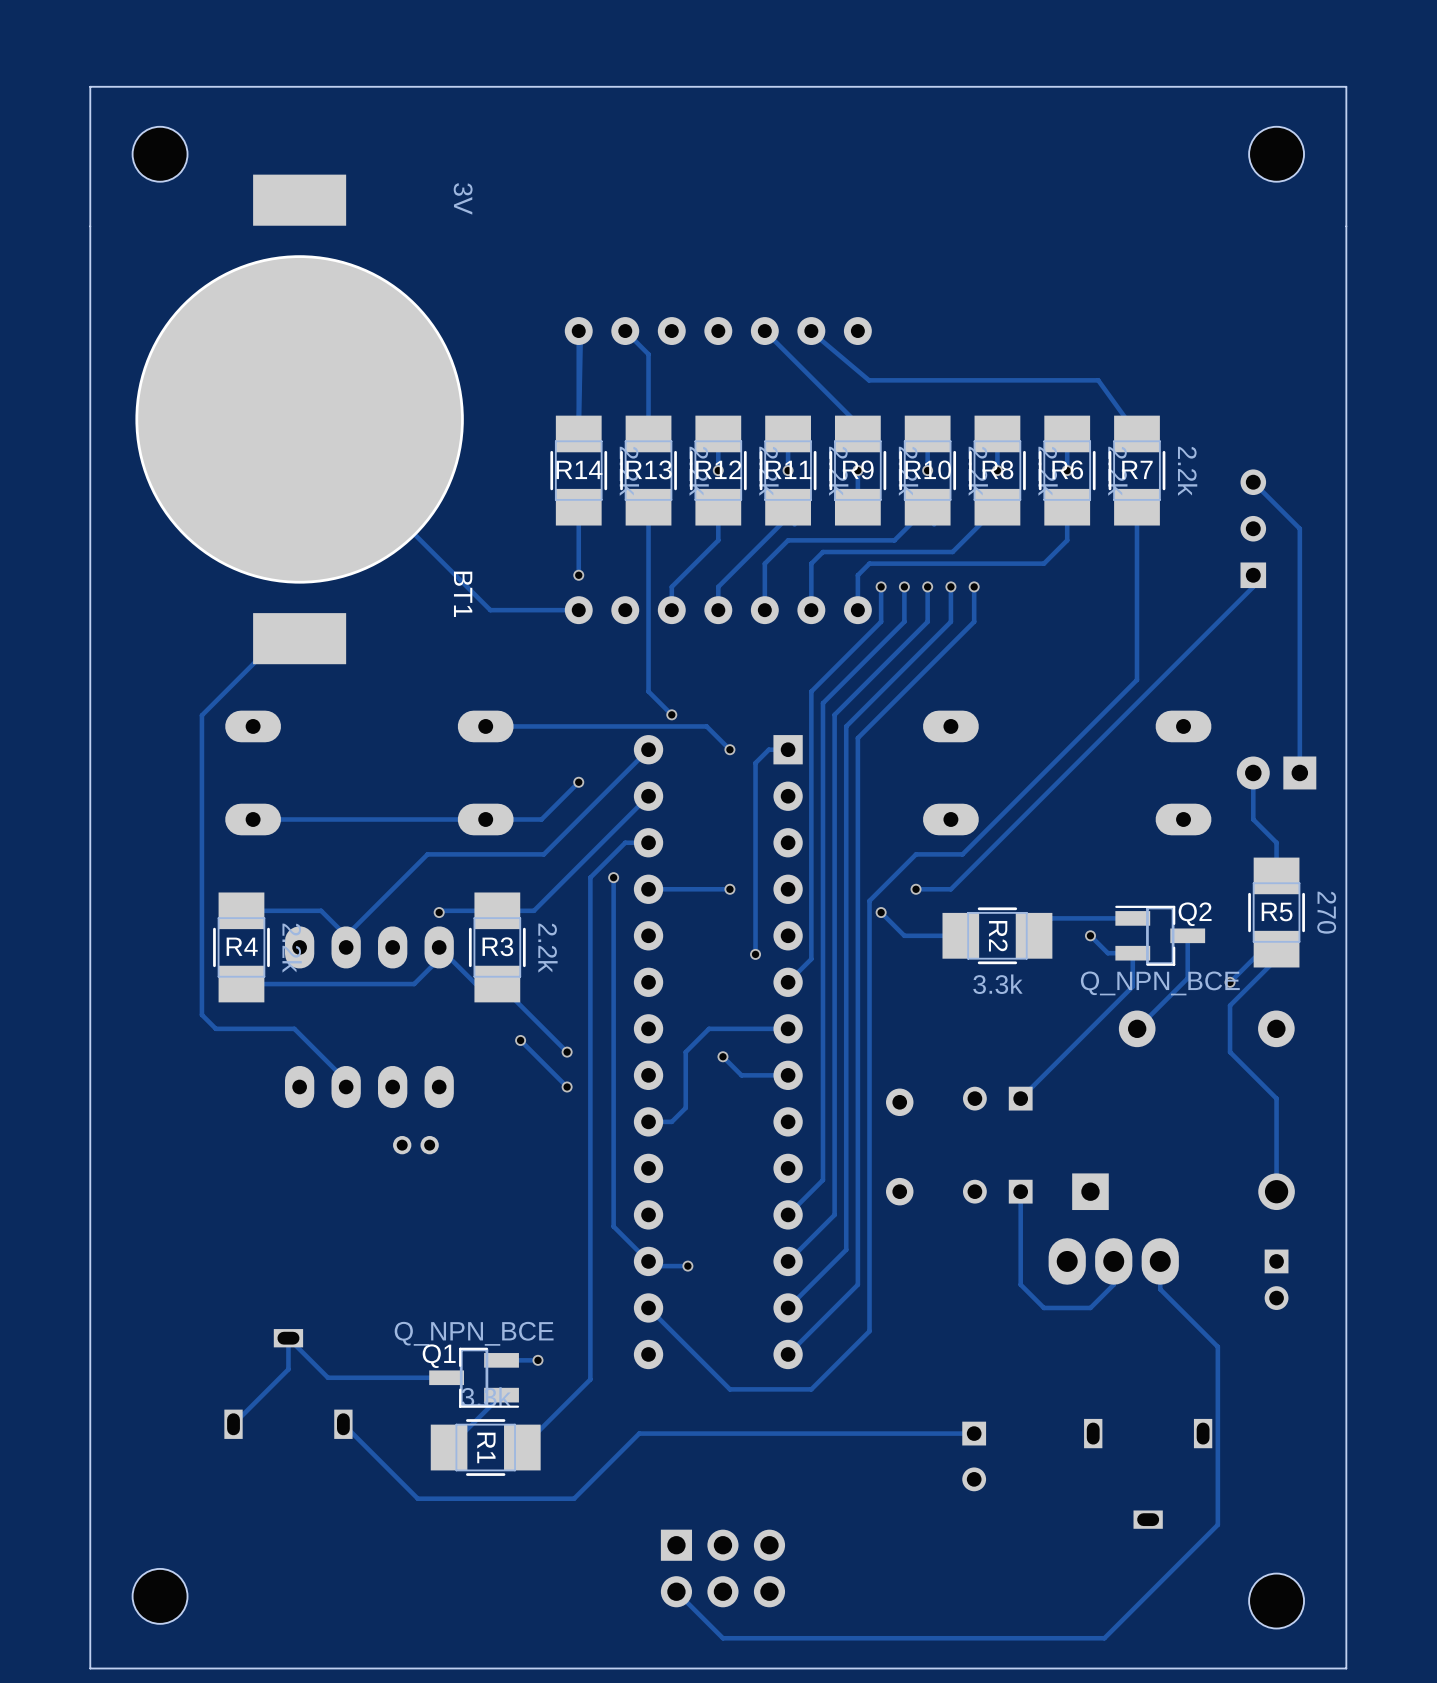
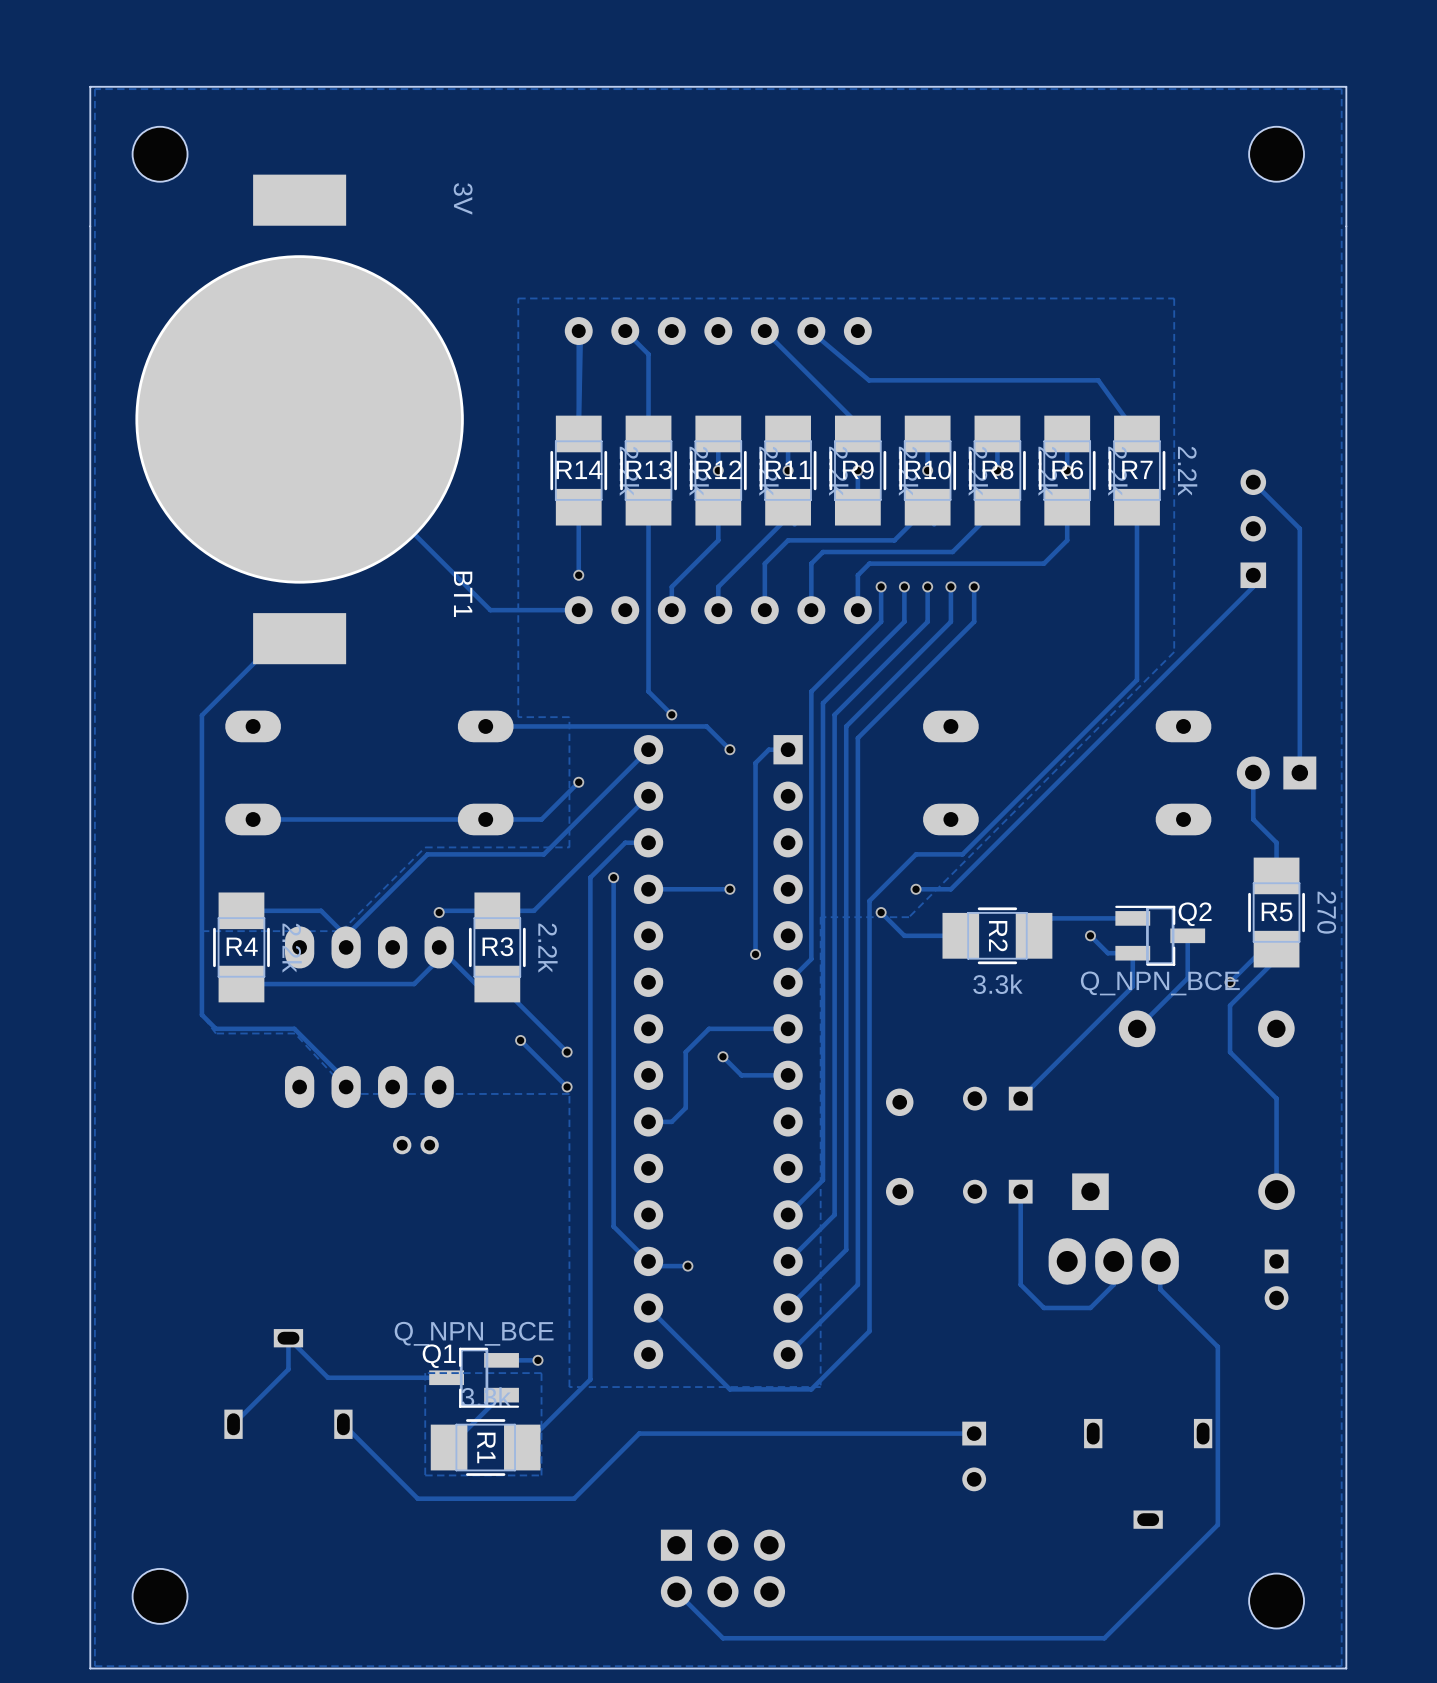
zone outline: none -> (1341, 89) (1341, 1666) (94, 1666) (94, 89) (1341, 89)
zone outline: none -> (1174, 298) (1174, 652) (909, 917) (820, 917) (820, 1387) (569, 1387) (569, 1093) (350, 1093) (294, 1033) (215, 1033) (201, 1014) (201, 931) (341, 931) (425, 847) (569, 847) (569, 717) (518, 717) (518, 298) (1174, 298)
zone outline: none -> (541, 1373) (541, 1475) (425, 1475) (425, 1373) (541, 1373)

